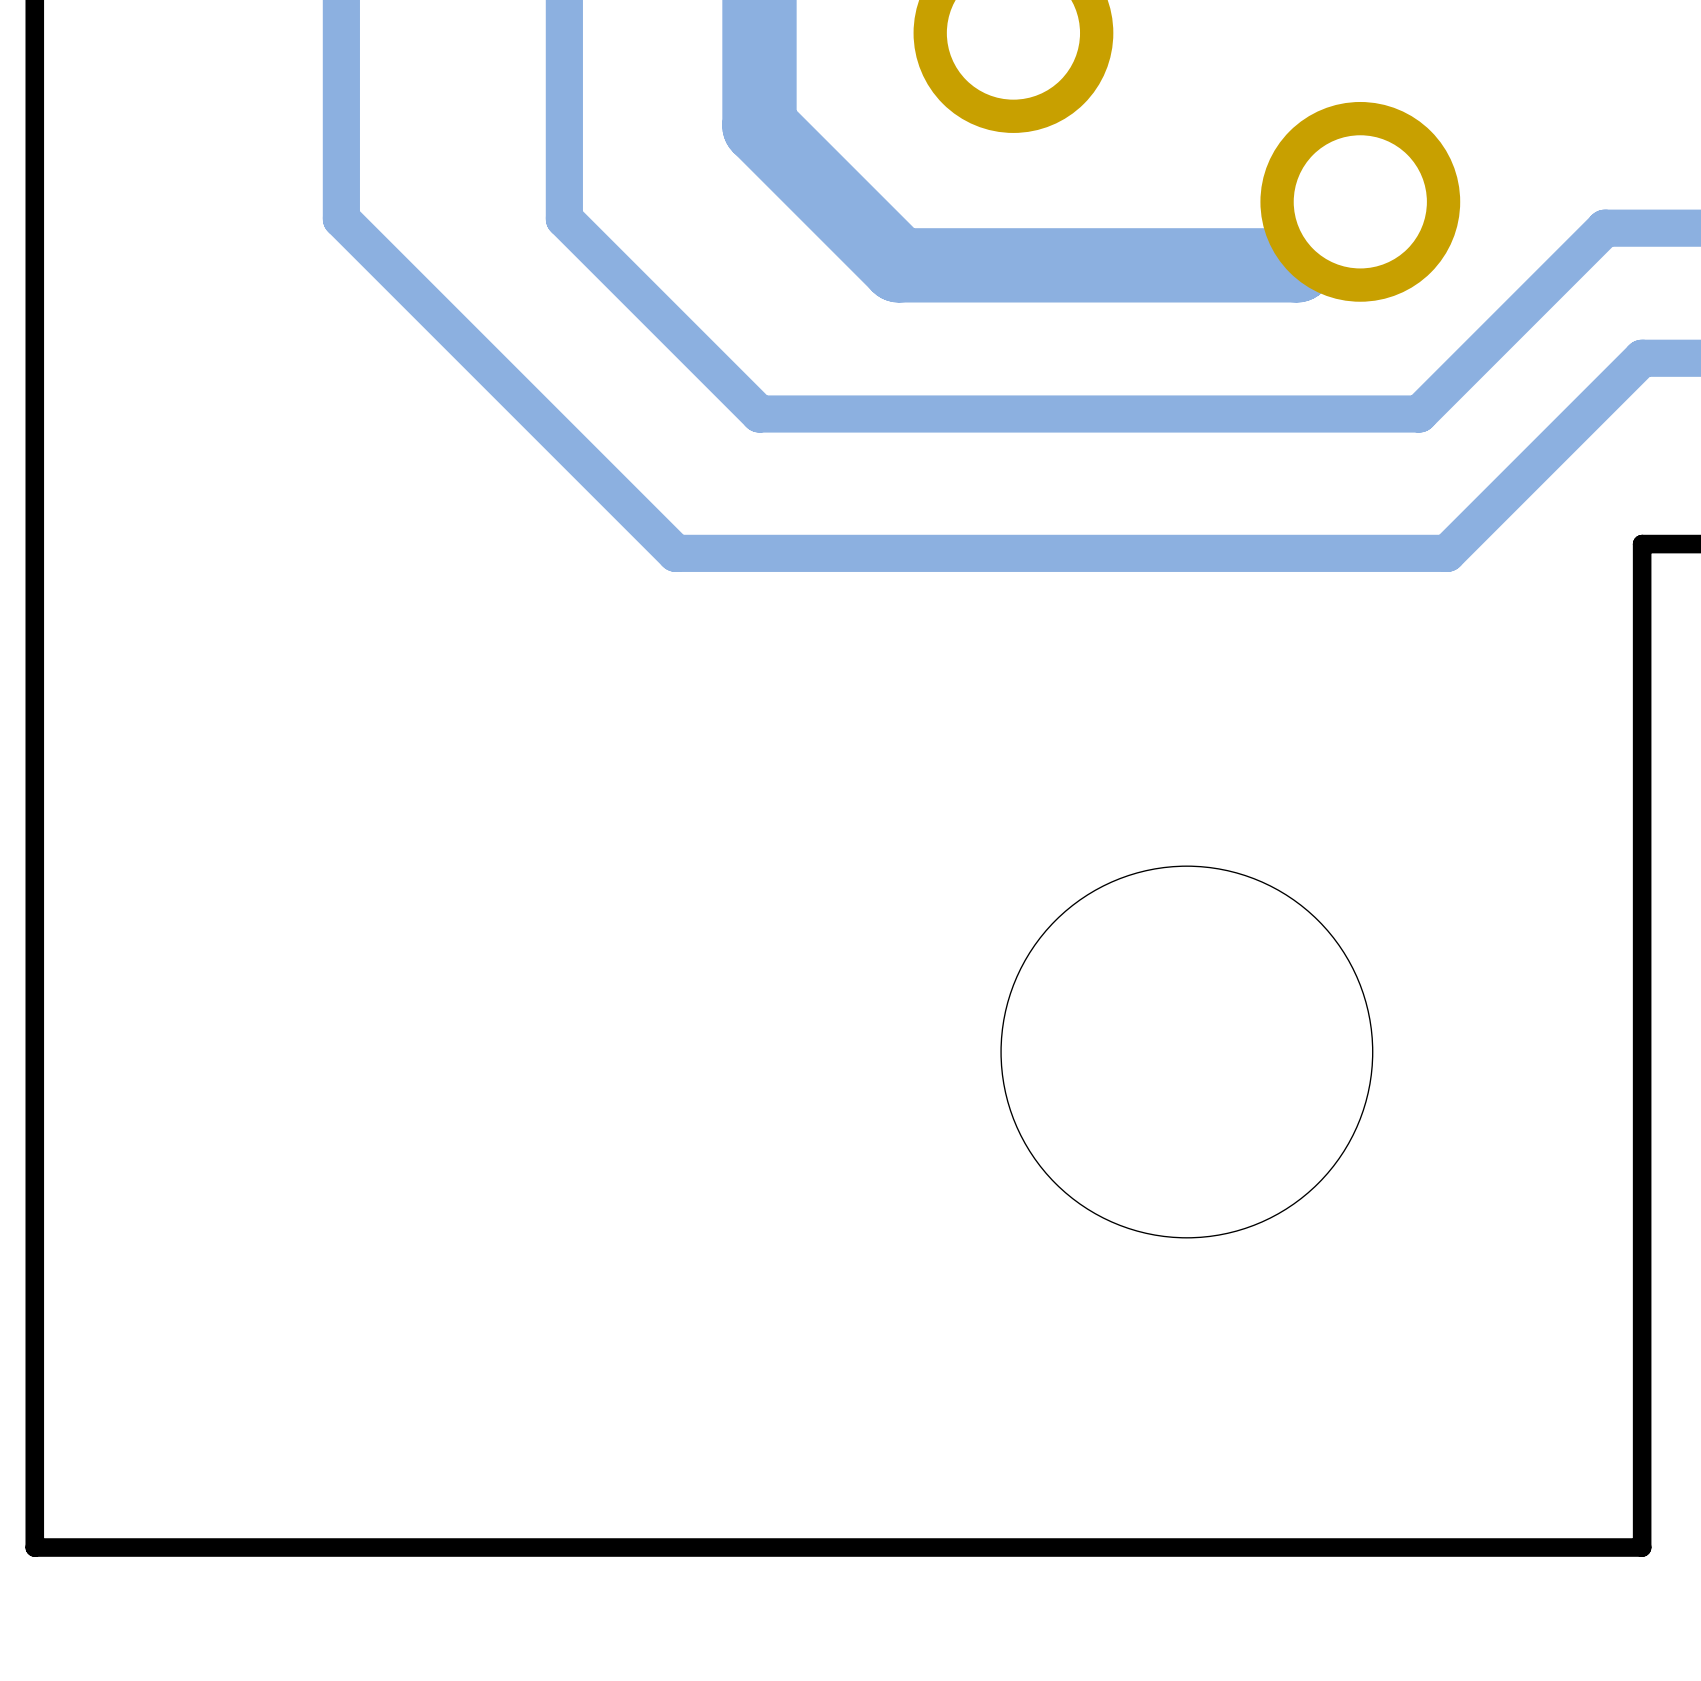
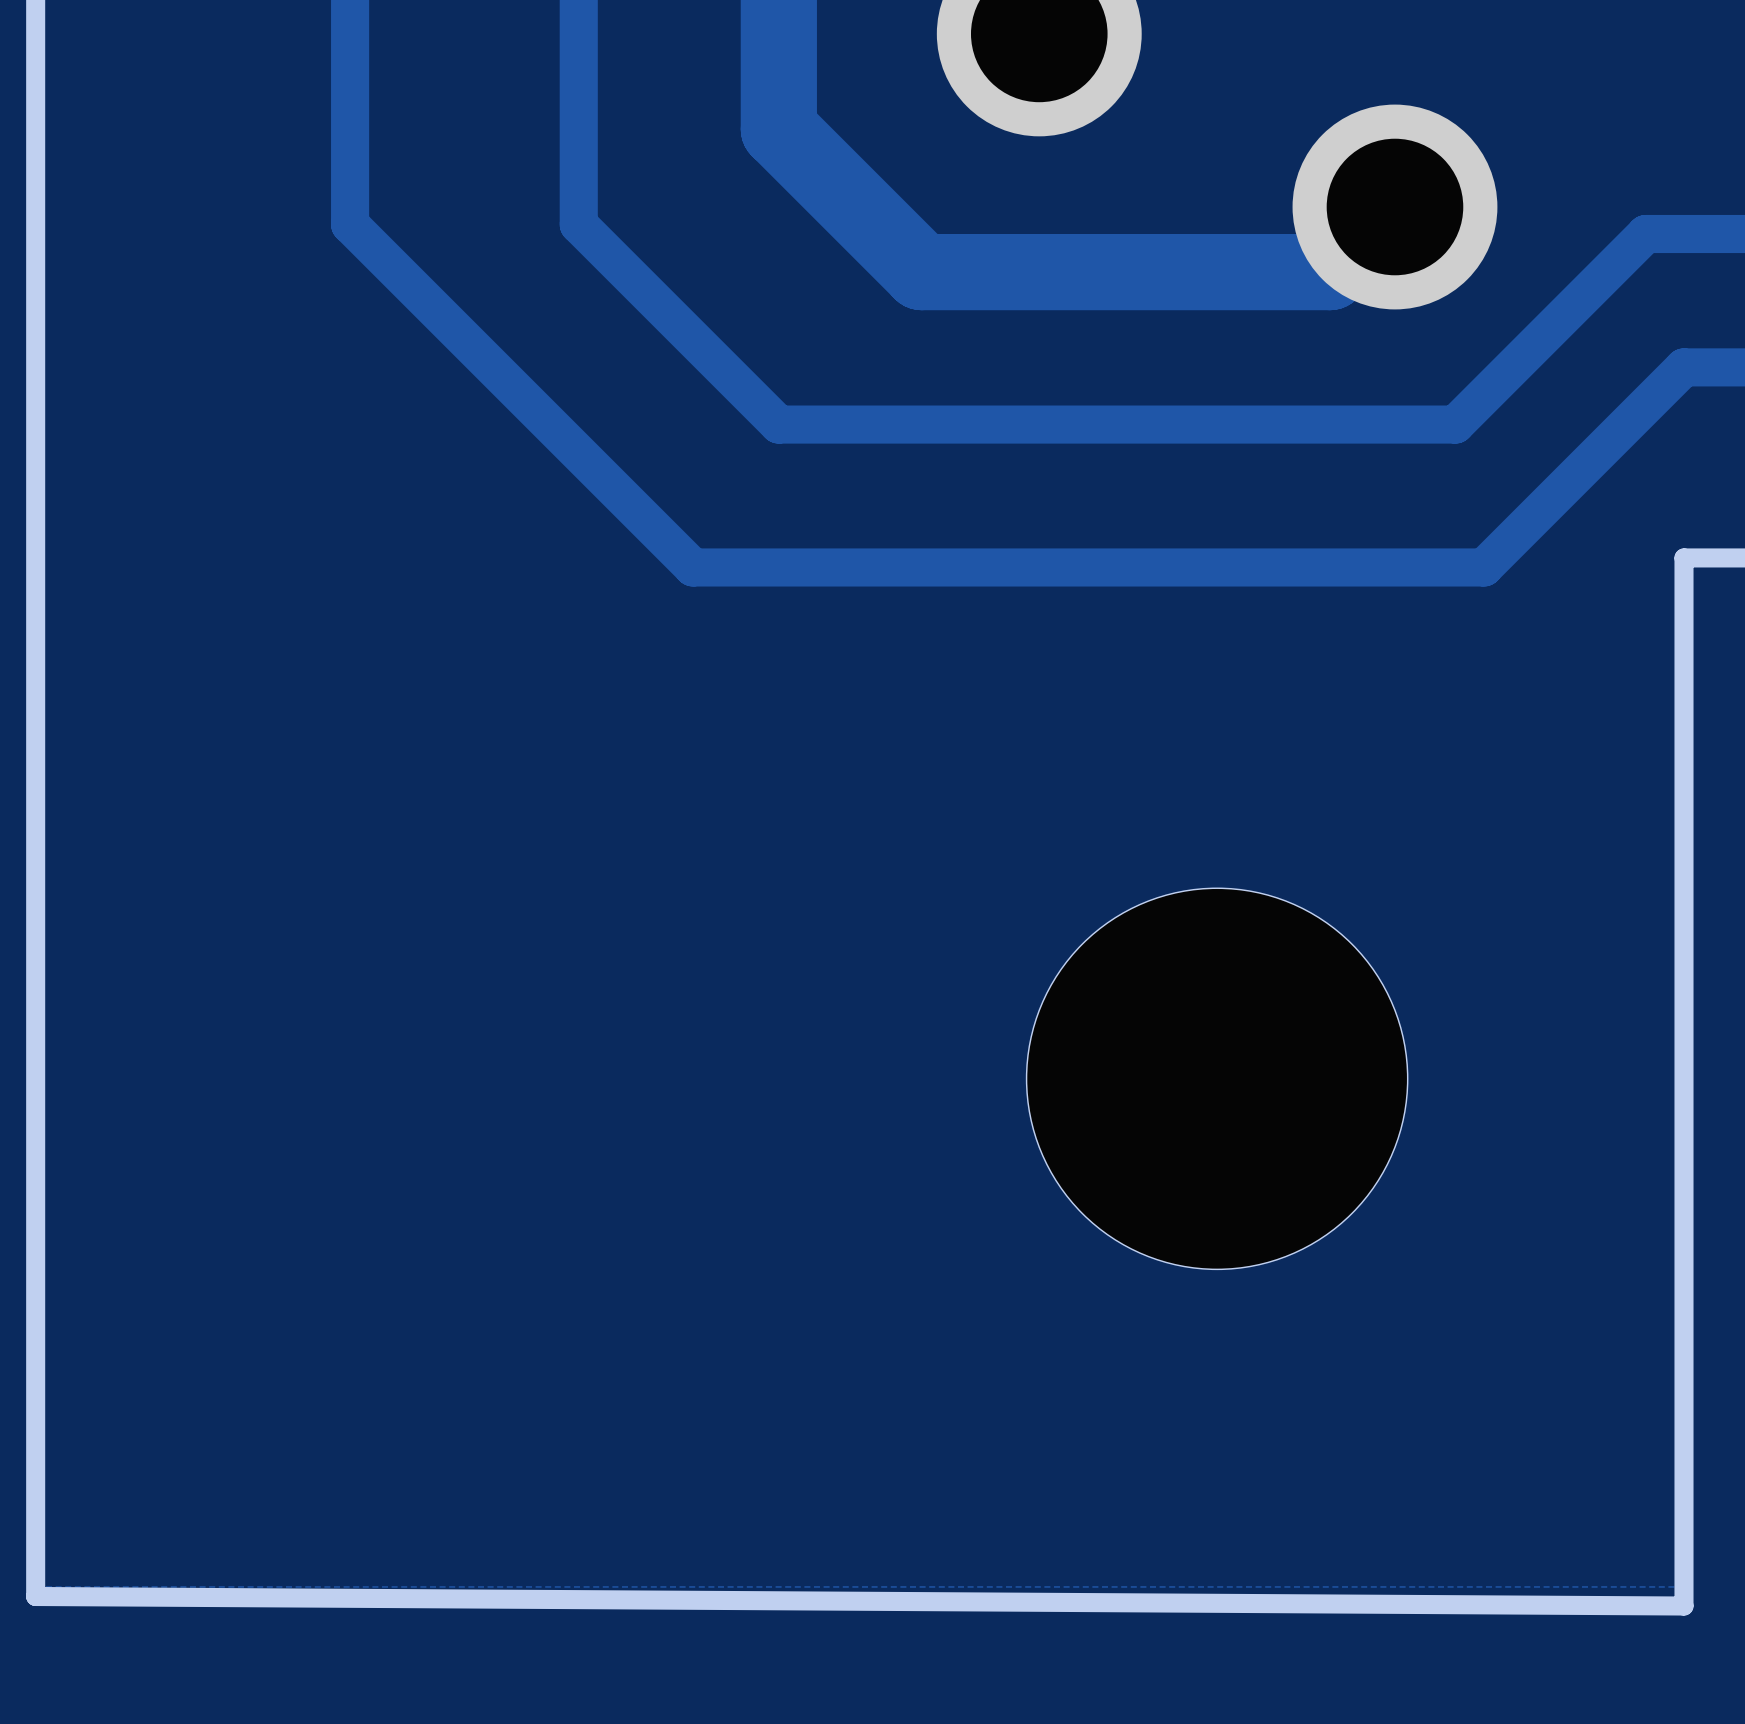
board edge: (1642, 1547) (34, 1547) -> (1683, 1586) (1683, 1606) (35, 1596) (35, 1586)

